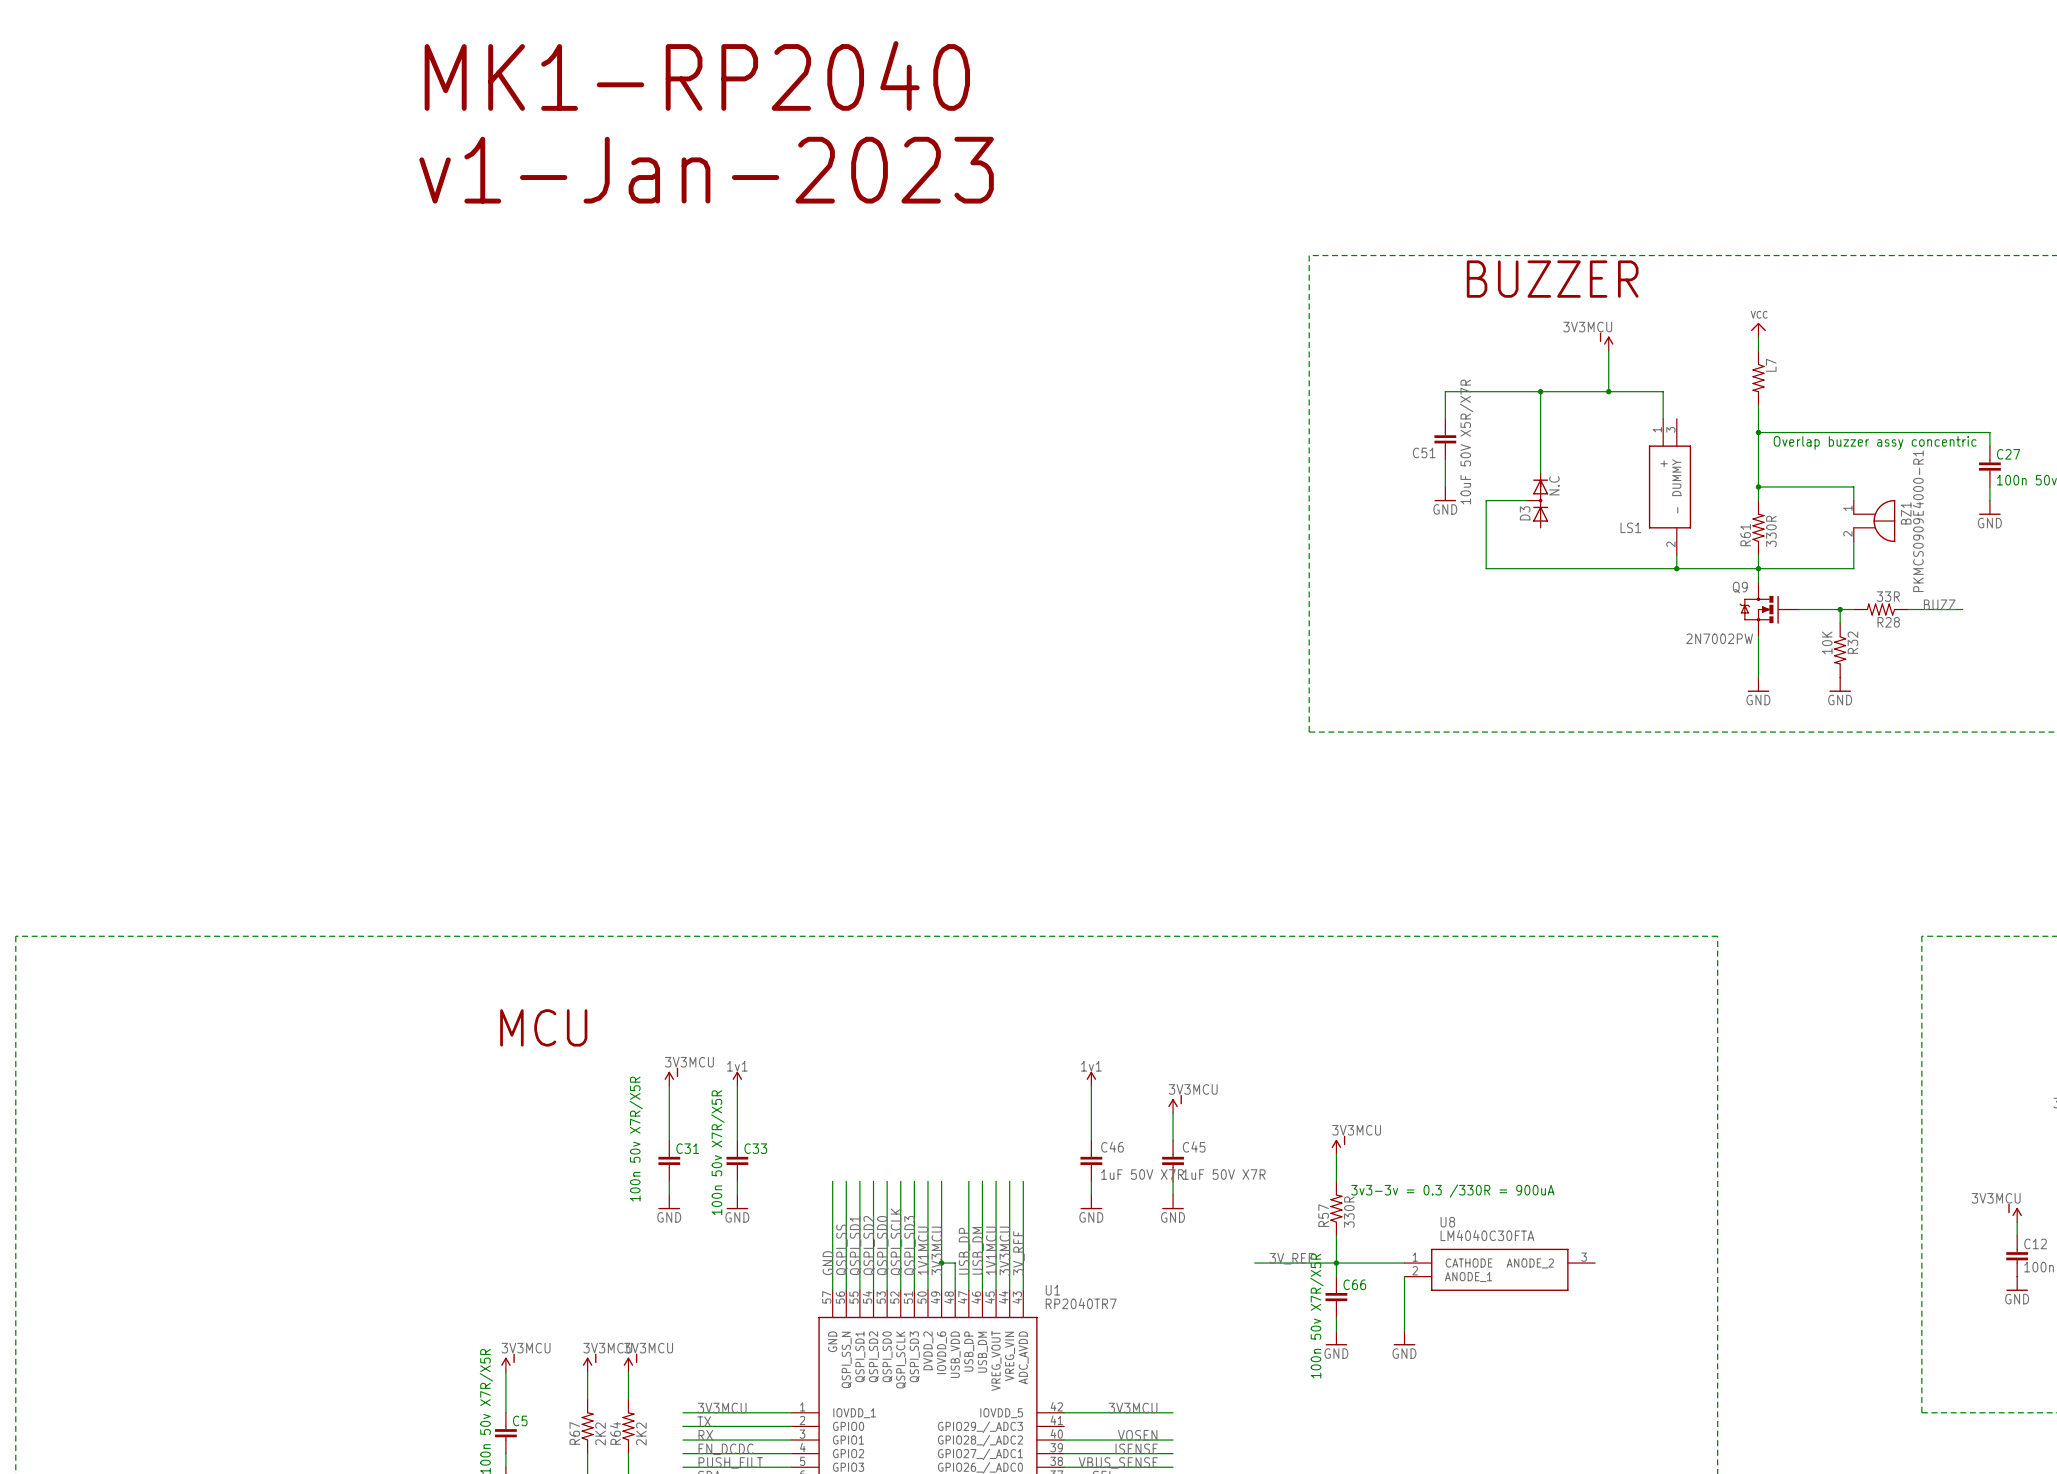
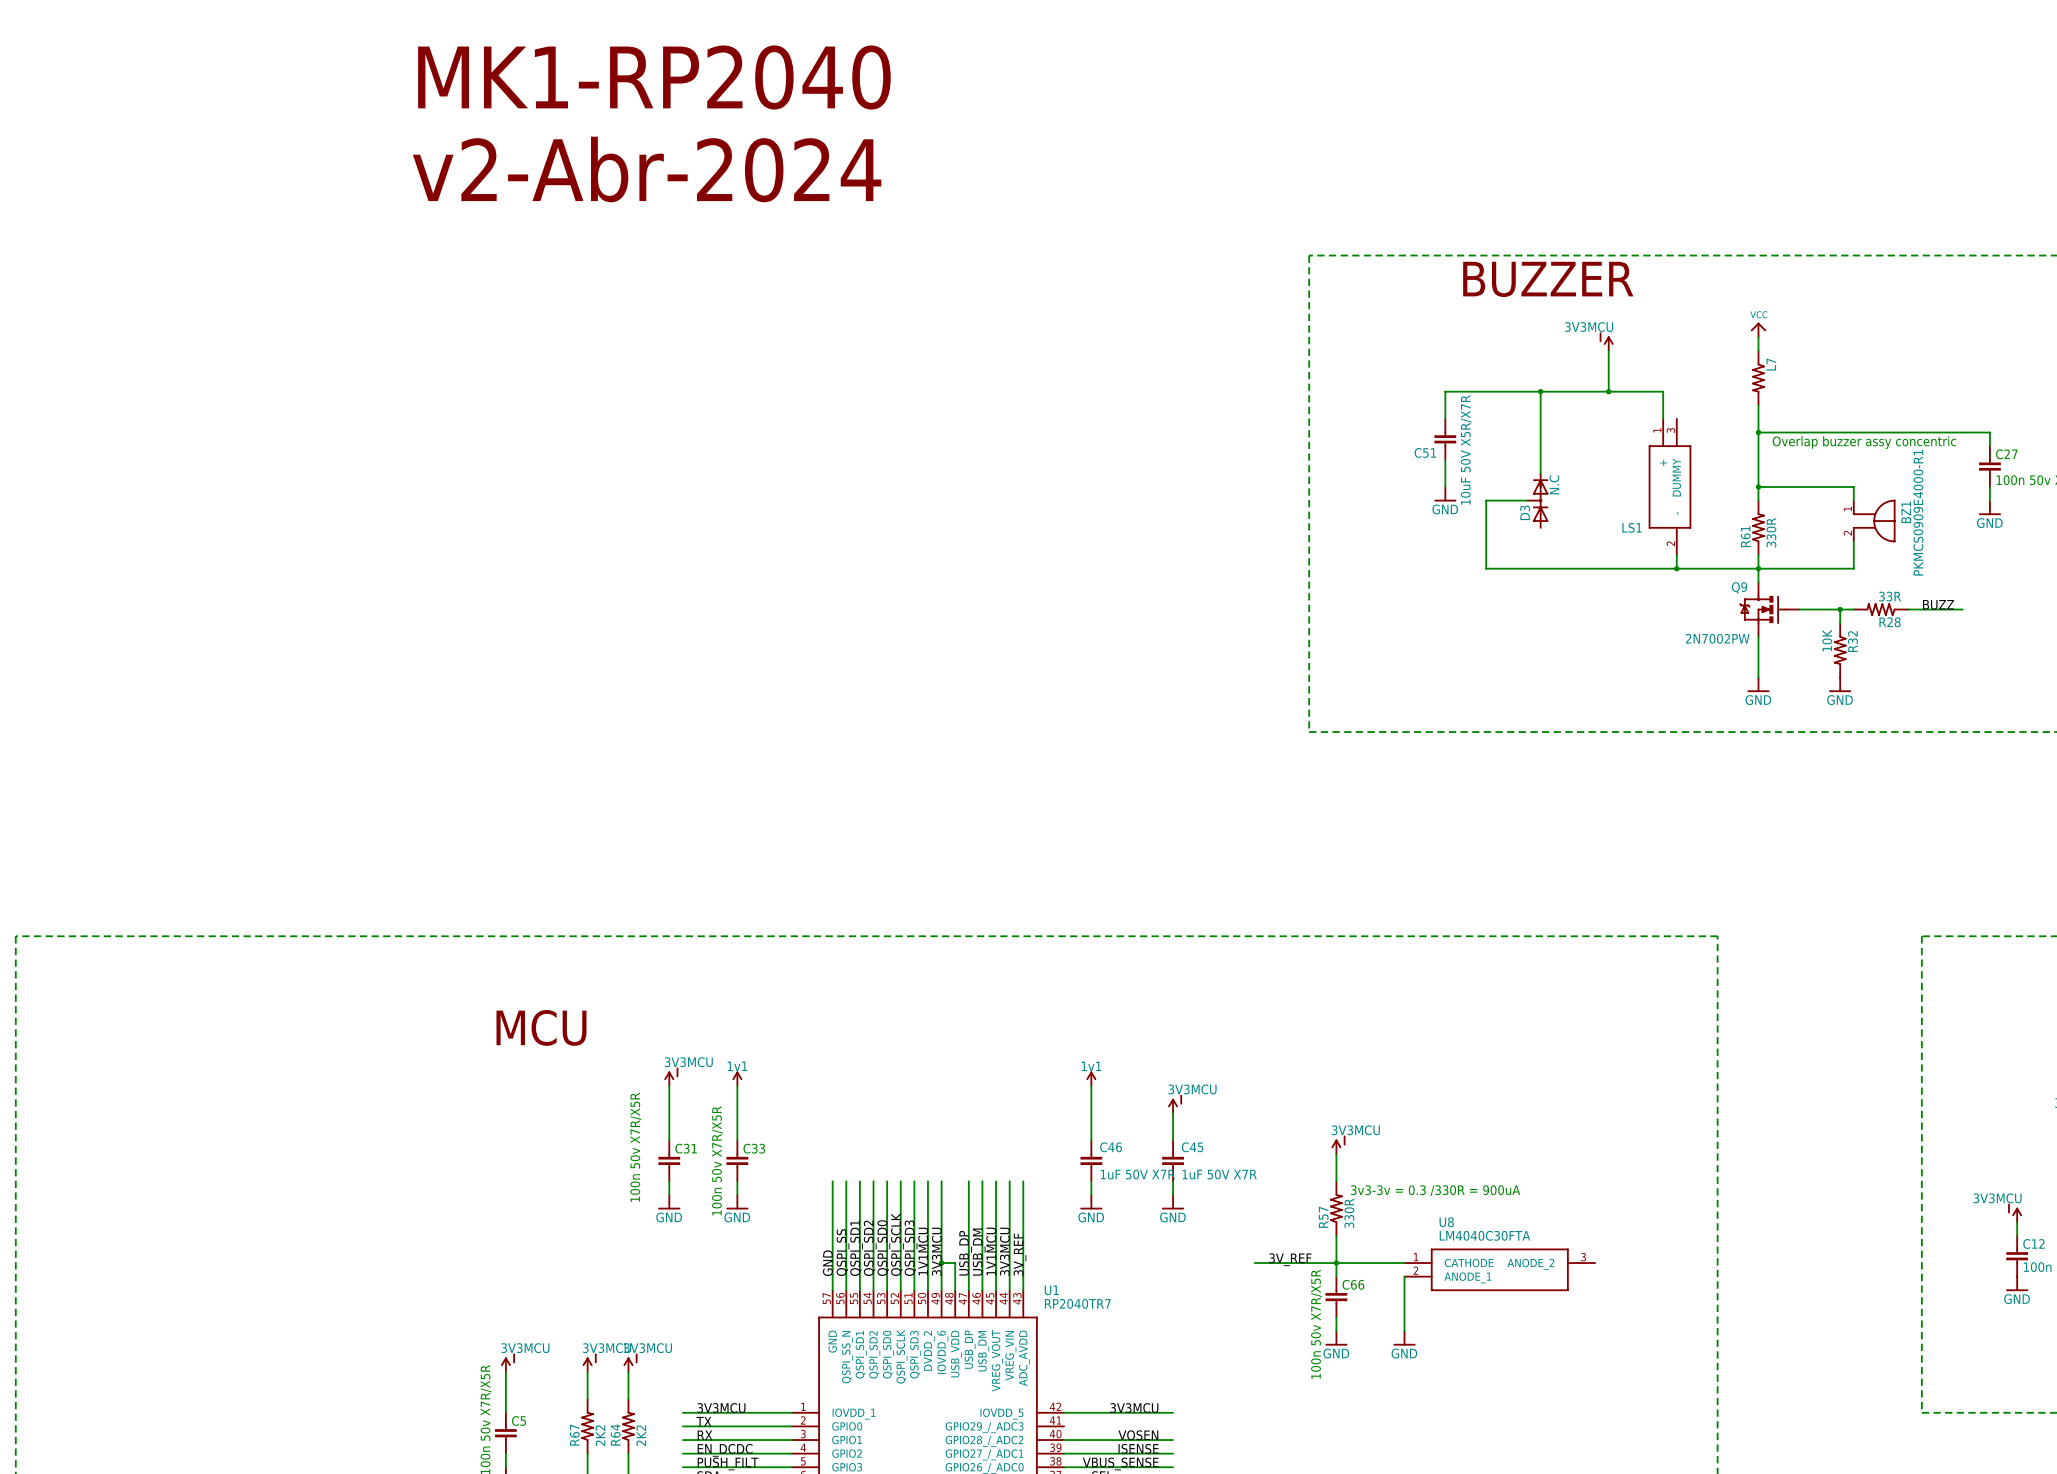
text: v1-Jan-2023 (706, 170) -> v2-Abr-2024 (647, 169)

